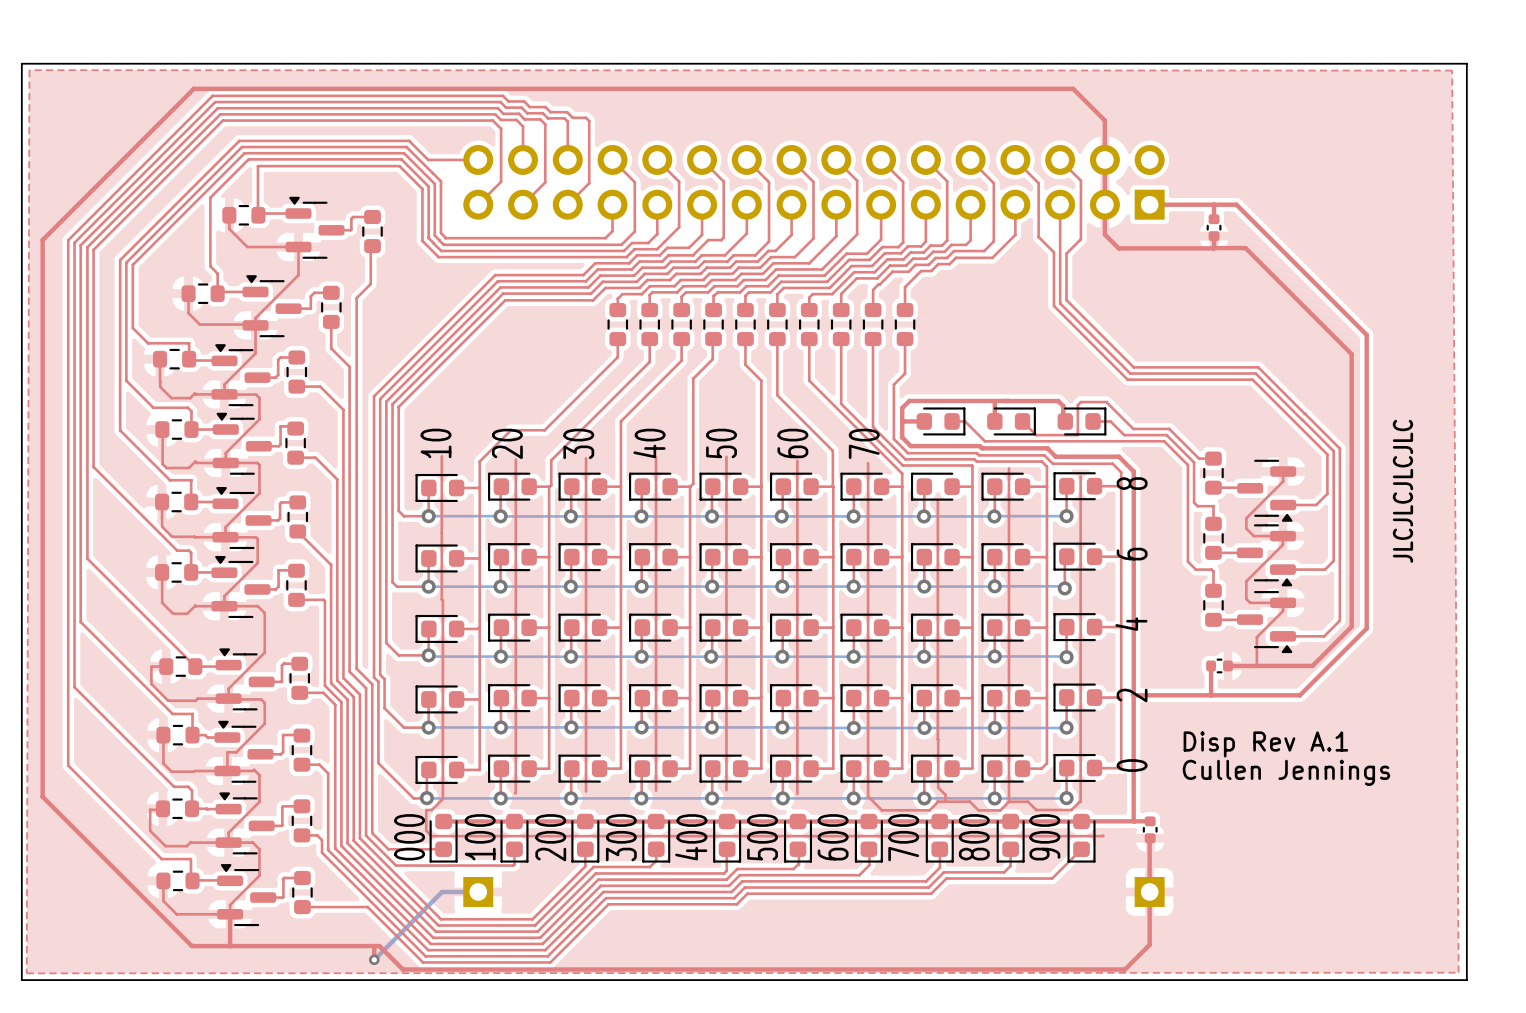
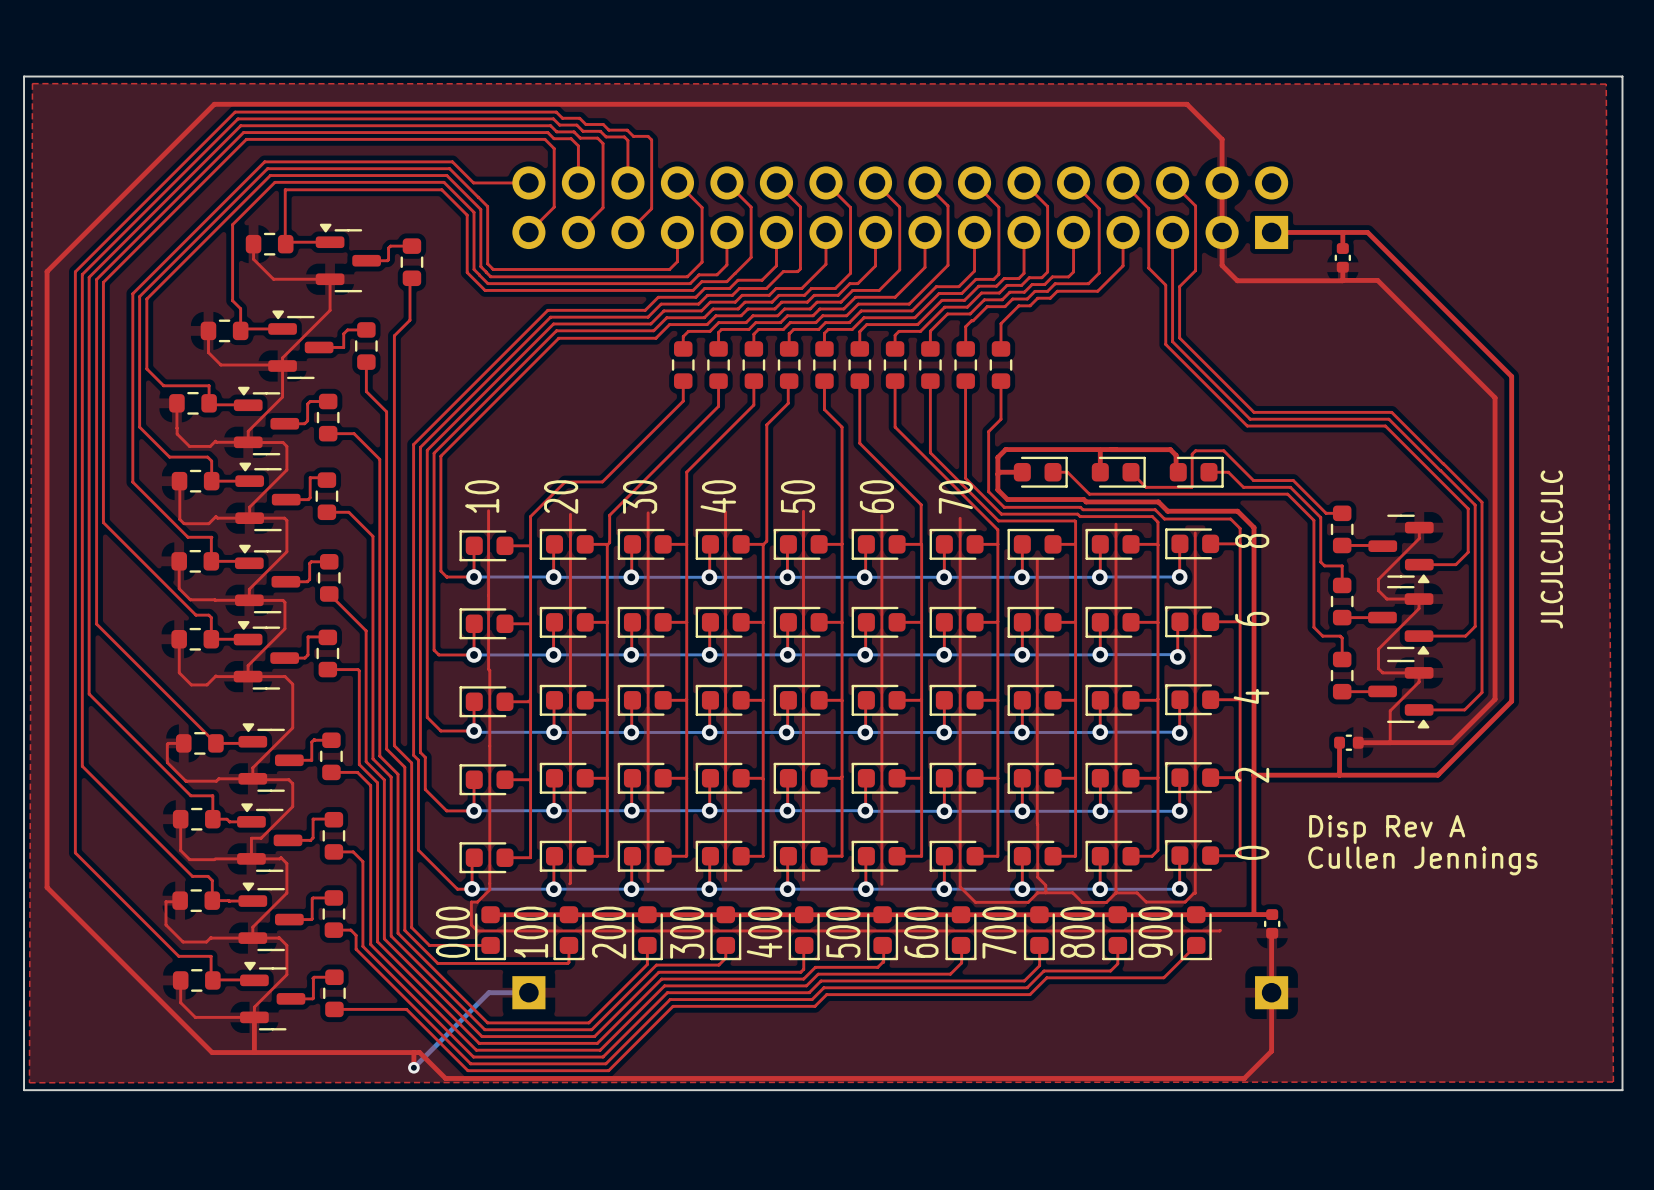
text: Disp Rev A.1 (1265, 744) -> Disp Rev A (1387, 829)

